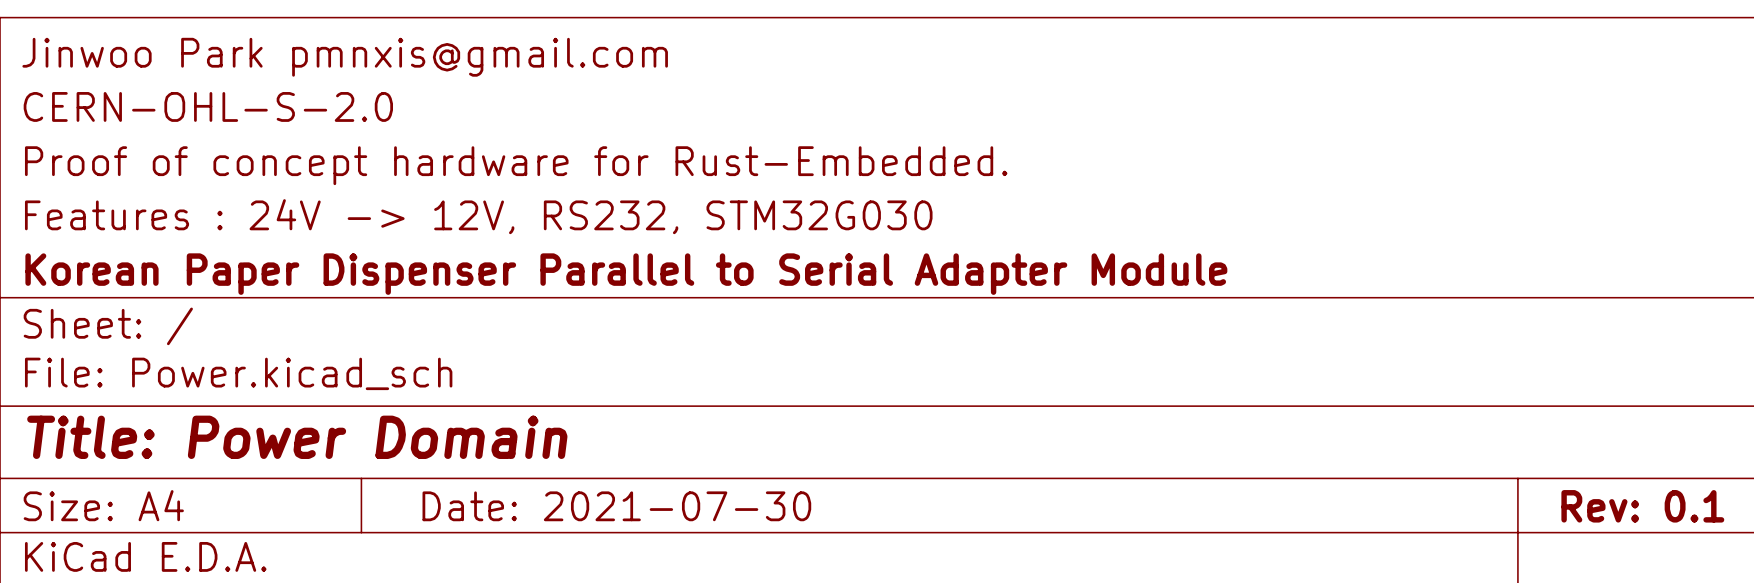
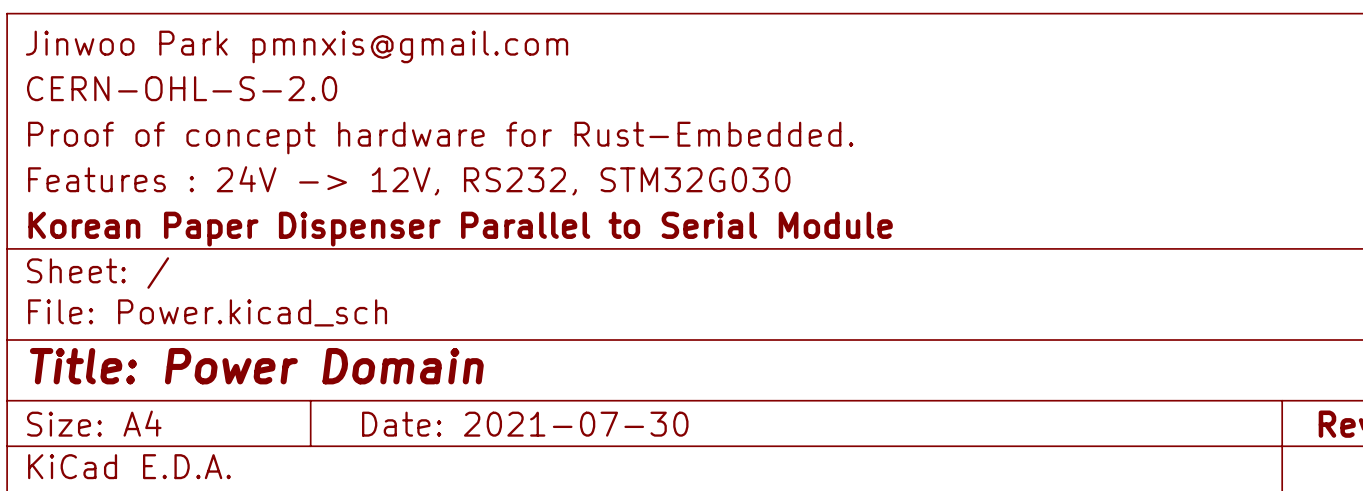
title block: Korean Paper Dispenser Parallel to Serial Adapter Module (626, 274) -> Korean Paper Dispenser Parallel to Serial Module (460, 229)

